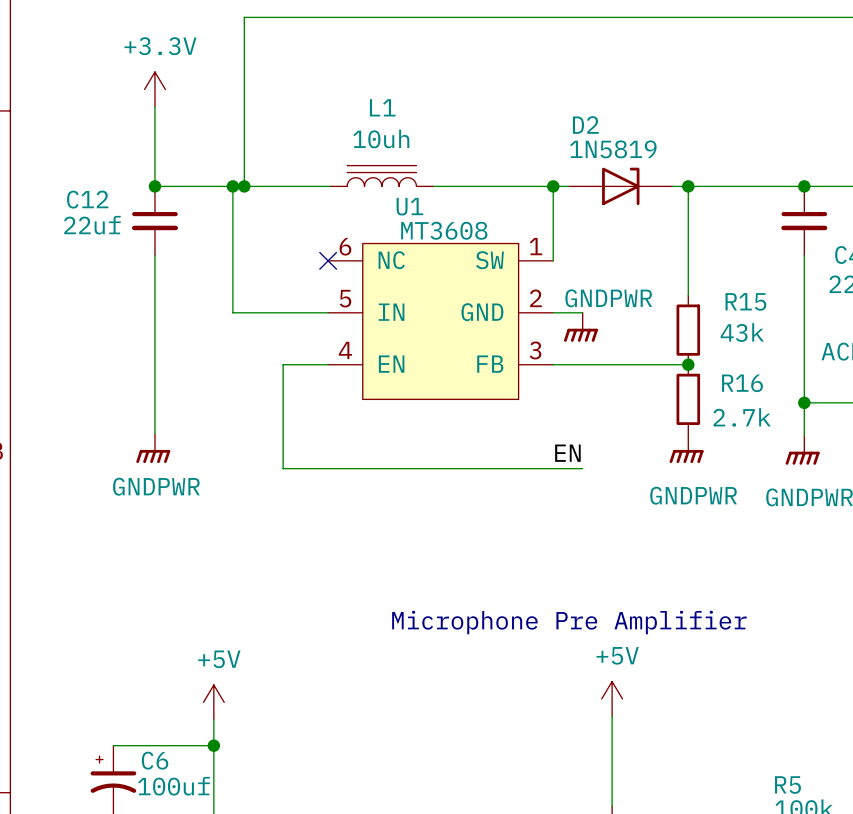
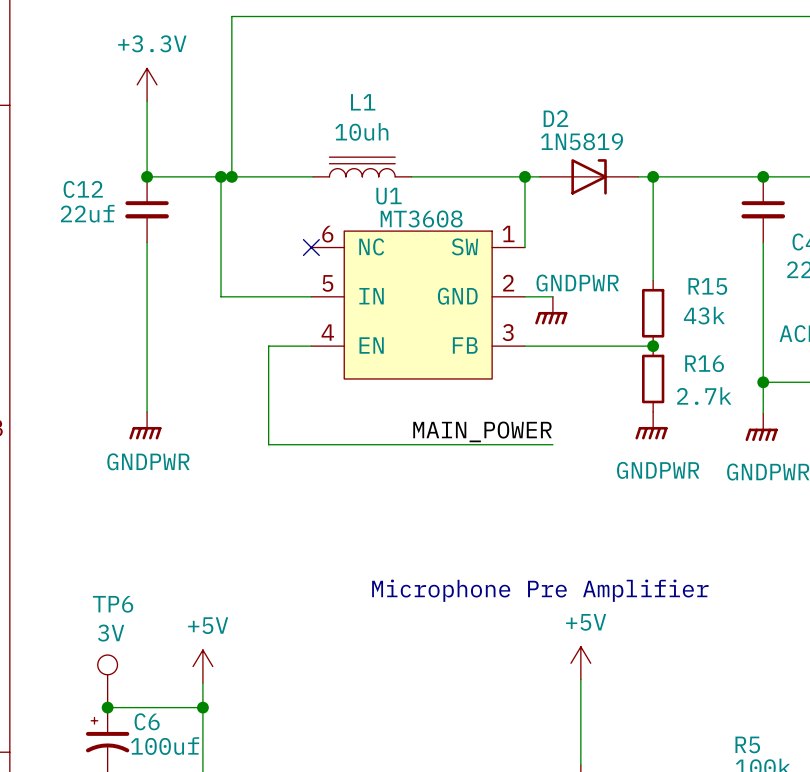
label: EN (567, 453) -> MAIN_POWER (482, 431)
TP6: none -> 3V (107, 681)
junction: none -> (107, 707)

